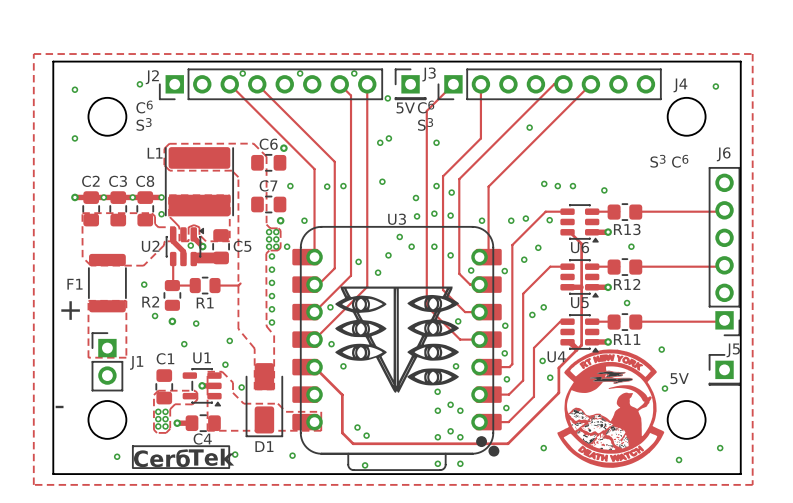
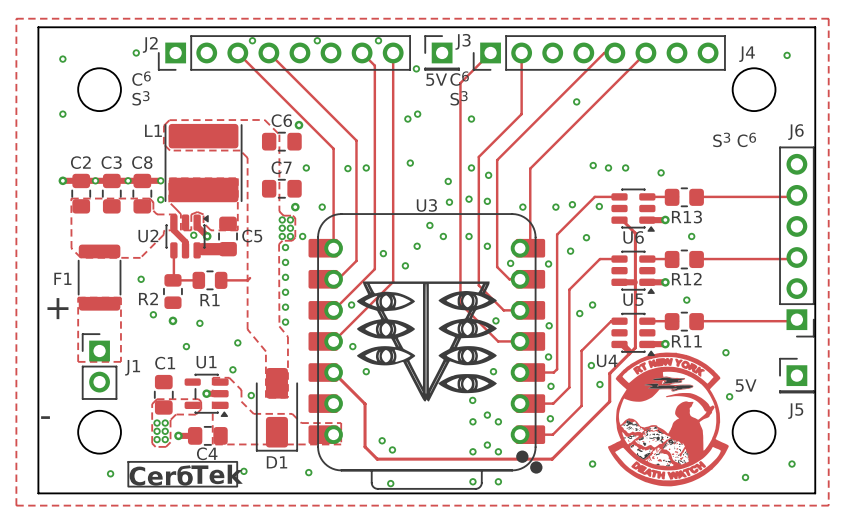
J5 name position: J5 (733, 350) -> J5 (795, 411)

